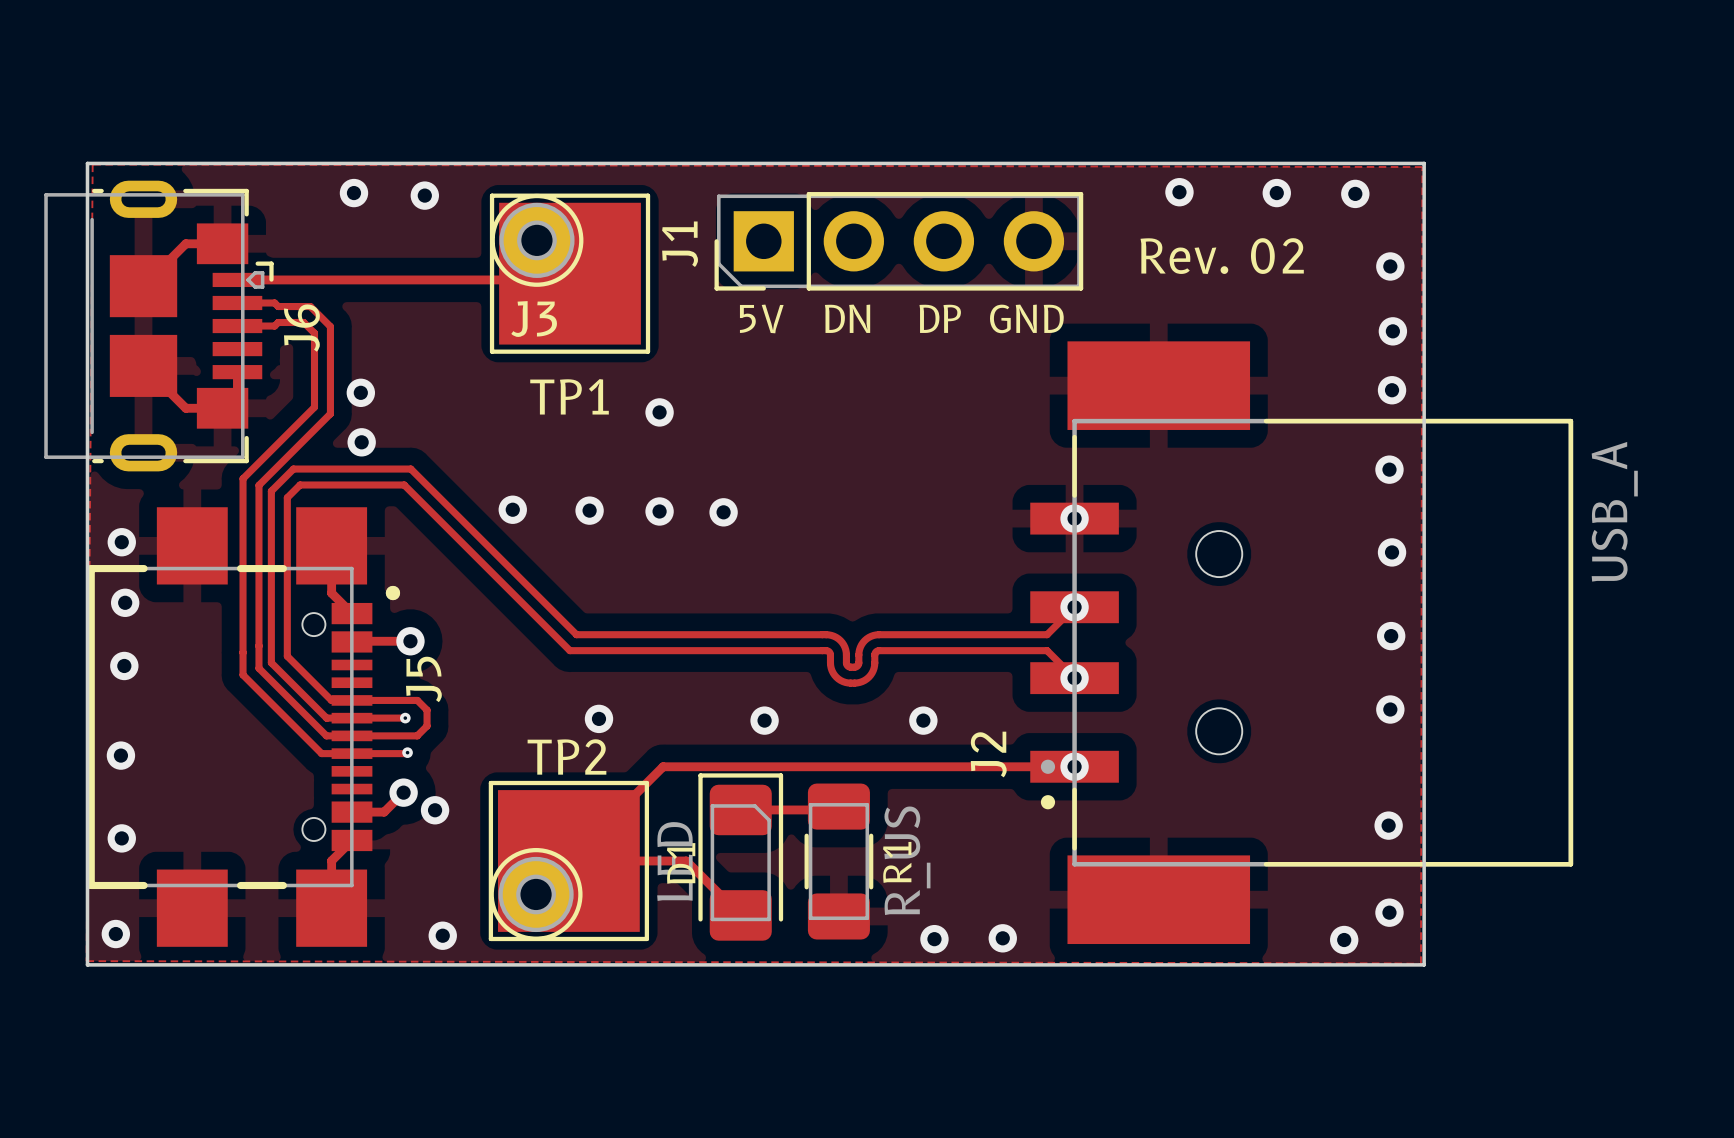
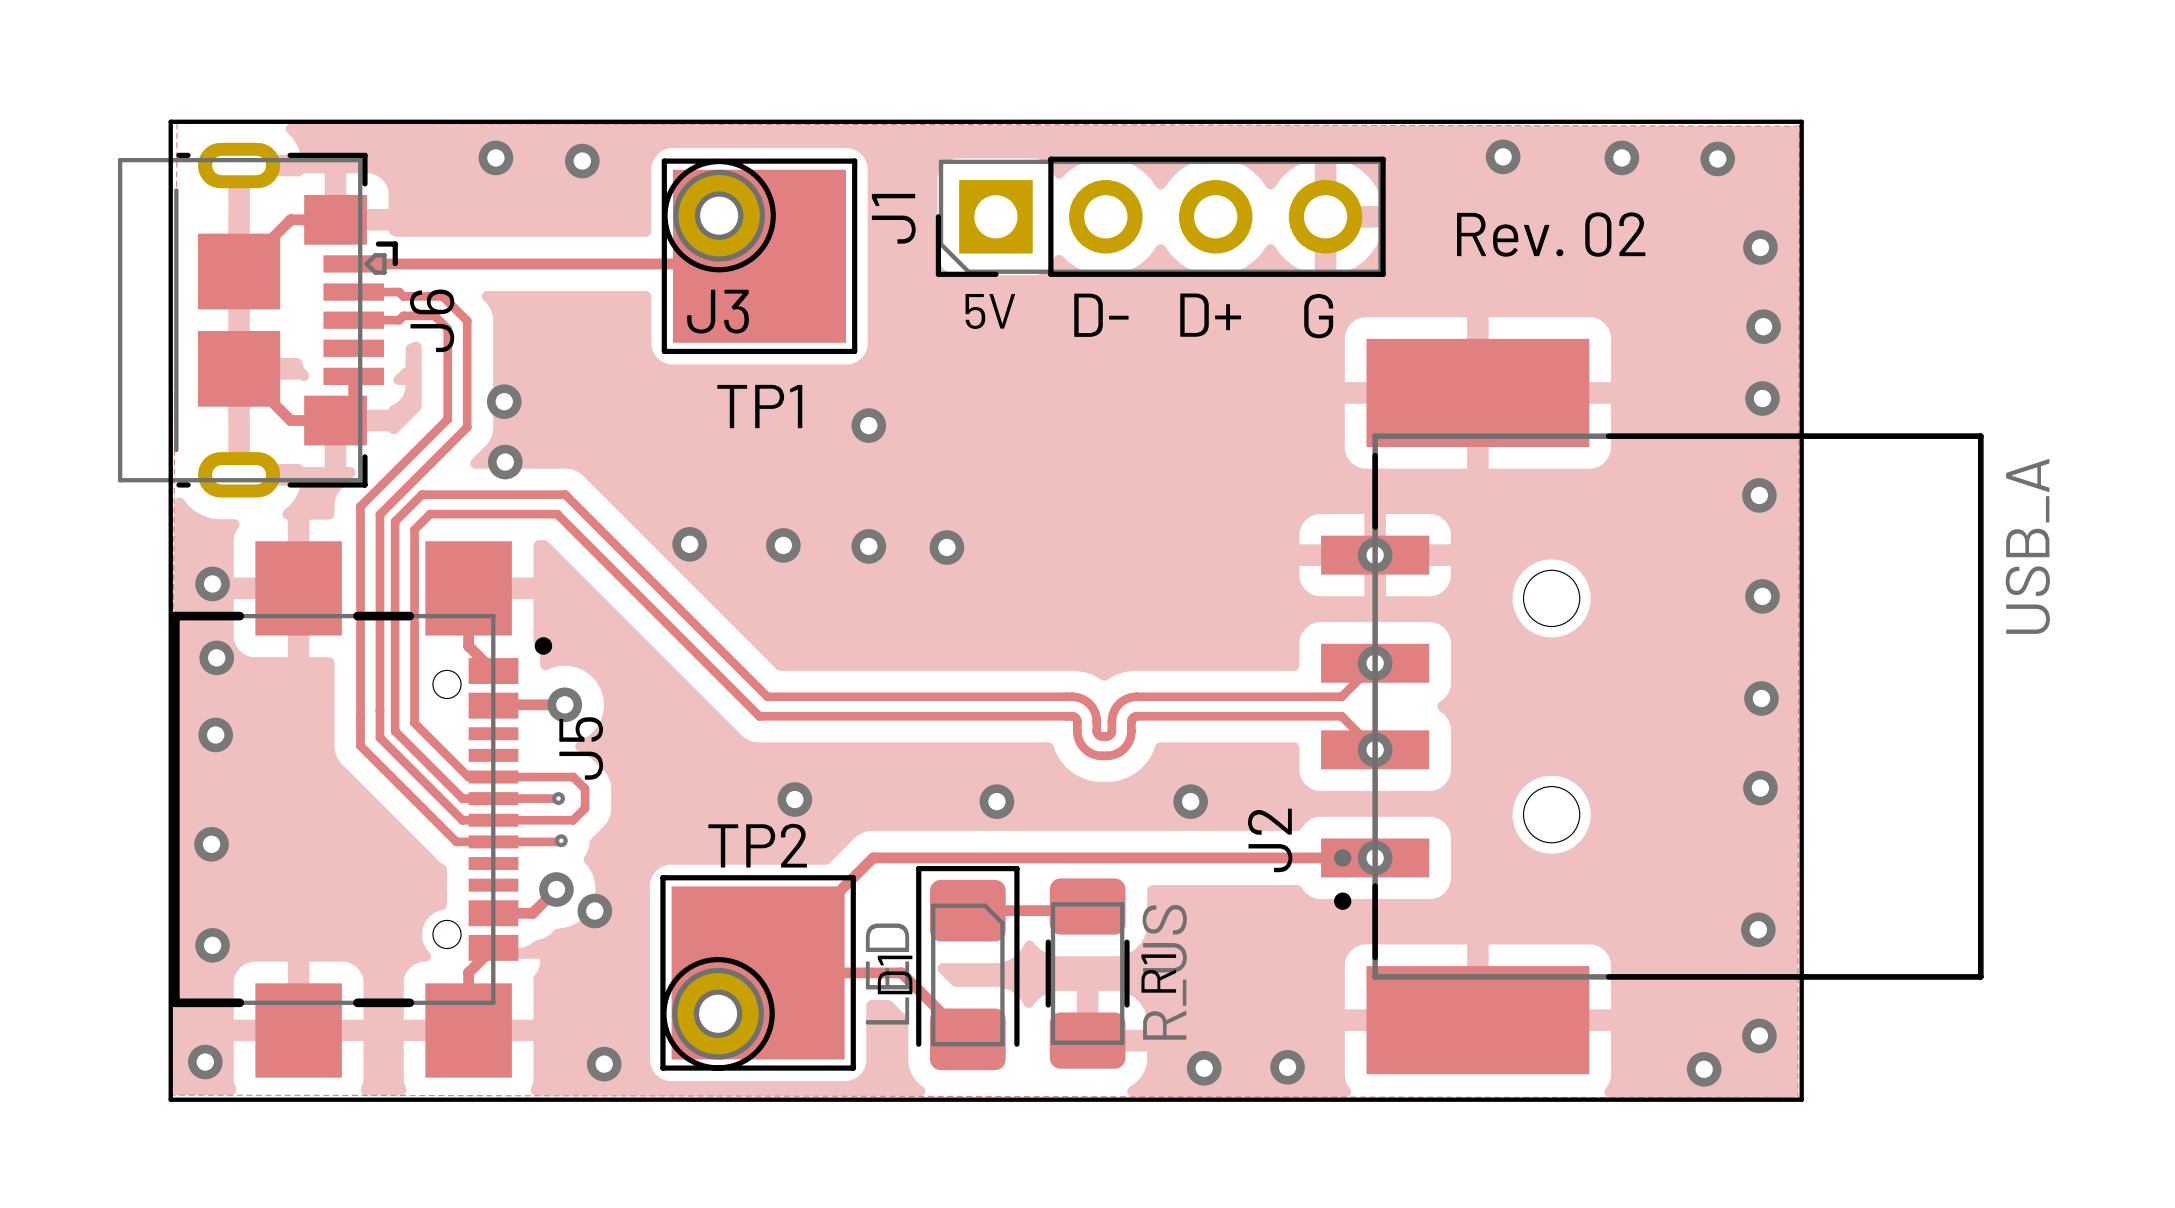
text: DN (847, 318) -> D- (1101, 315)
text: DP (940, 318) -> D+ (1210, 315)
text: GND (1026, 318) -> G (1318, 316)

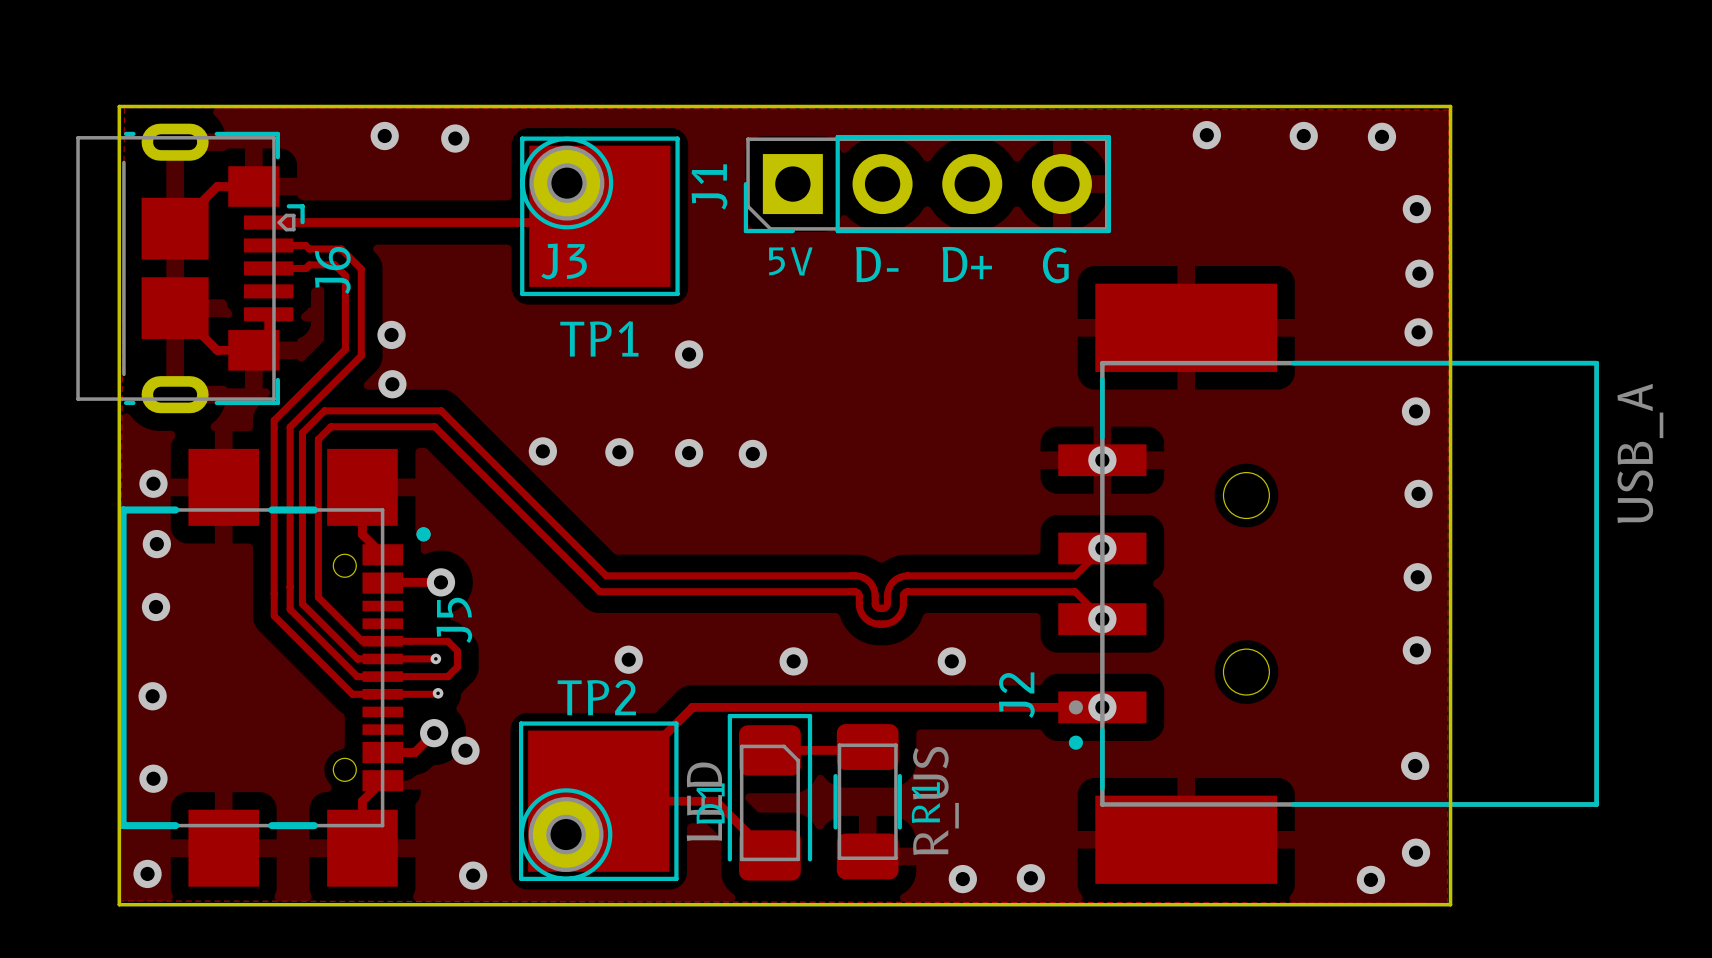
text: Rev. 02 (1551, 234) -> none

